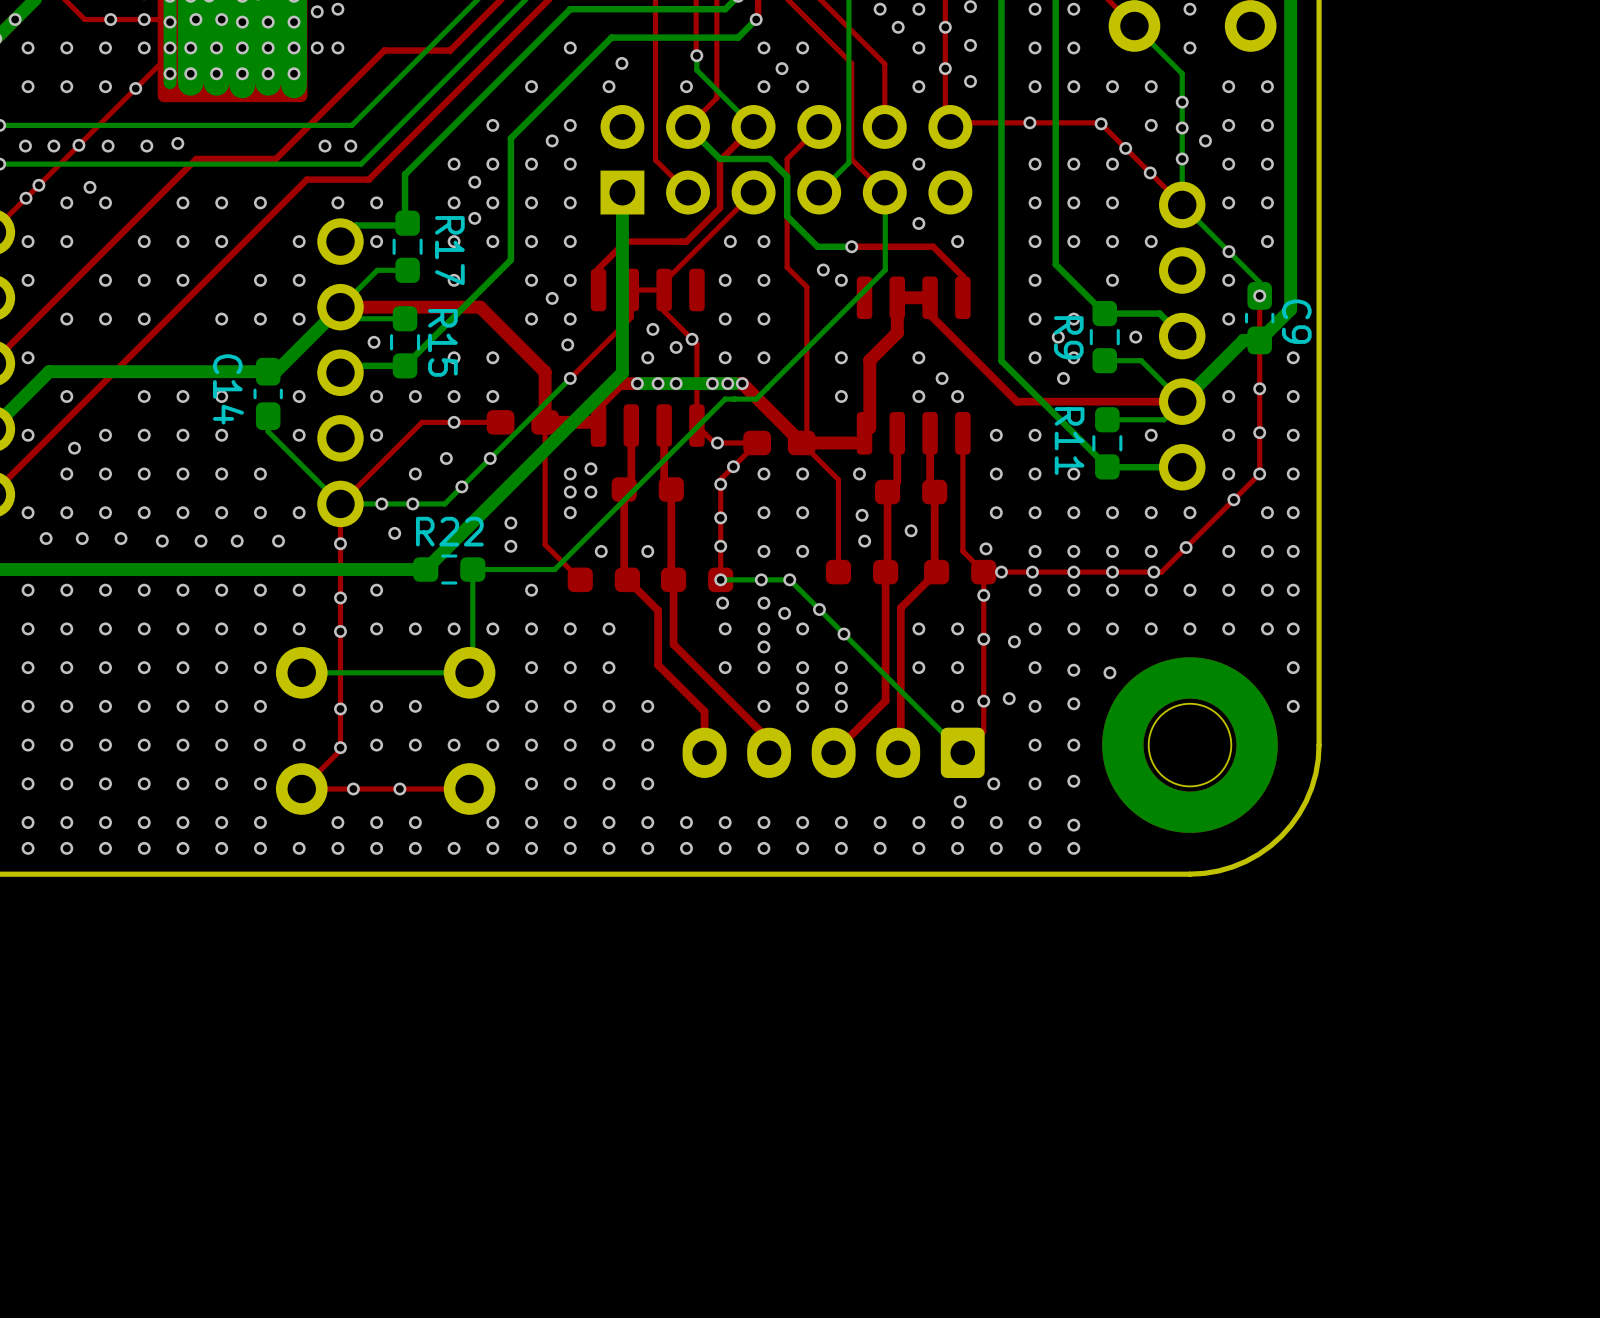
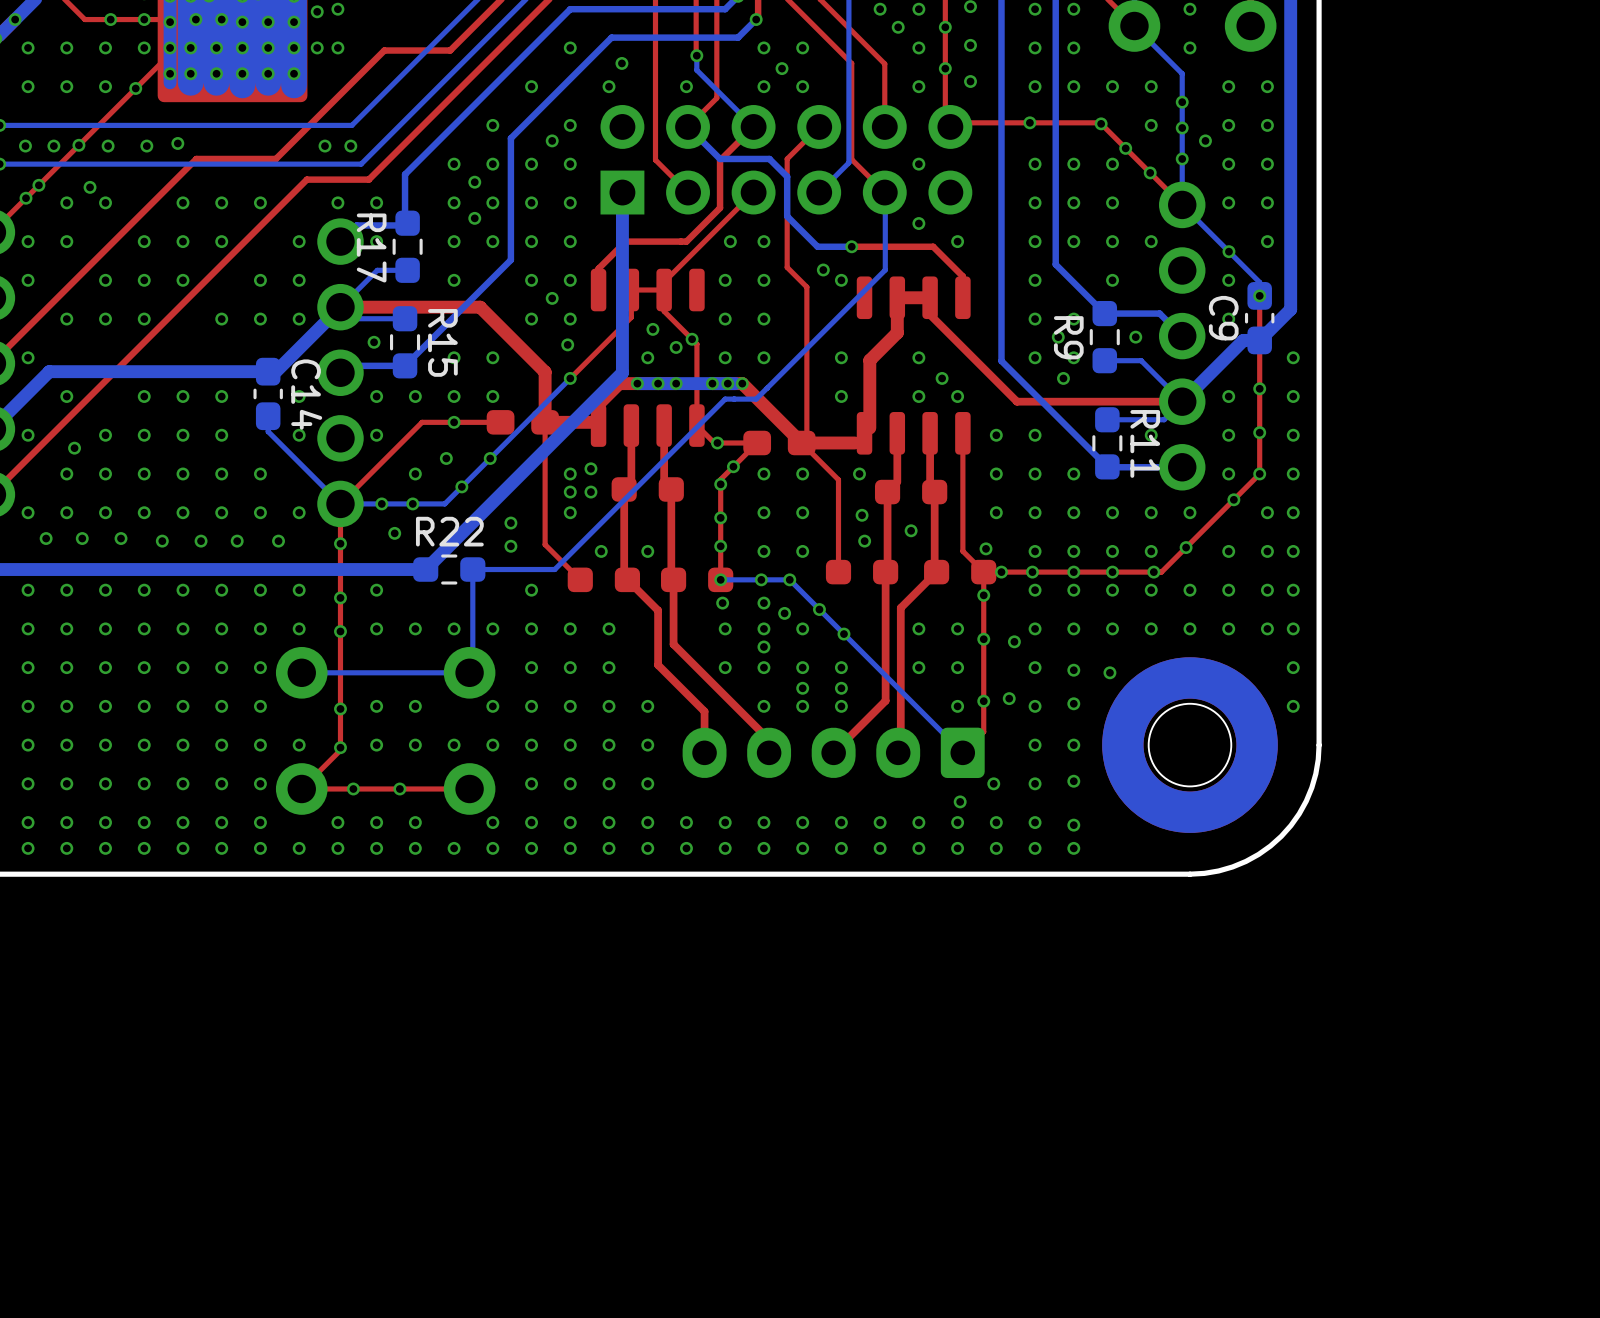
R17 name position: R17 (449, 250) -> R17 (371, 247)
C9 name position: C9 (1296, 321) -> C9 (1223, 318)
C14 name position: C14 (228, 389) -> C14 (306, 394)
R11 name position: R11 (1069, 441) -> R11 (1145, 443)

